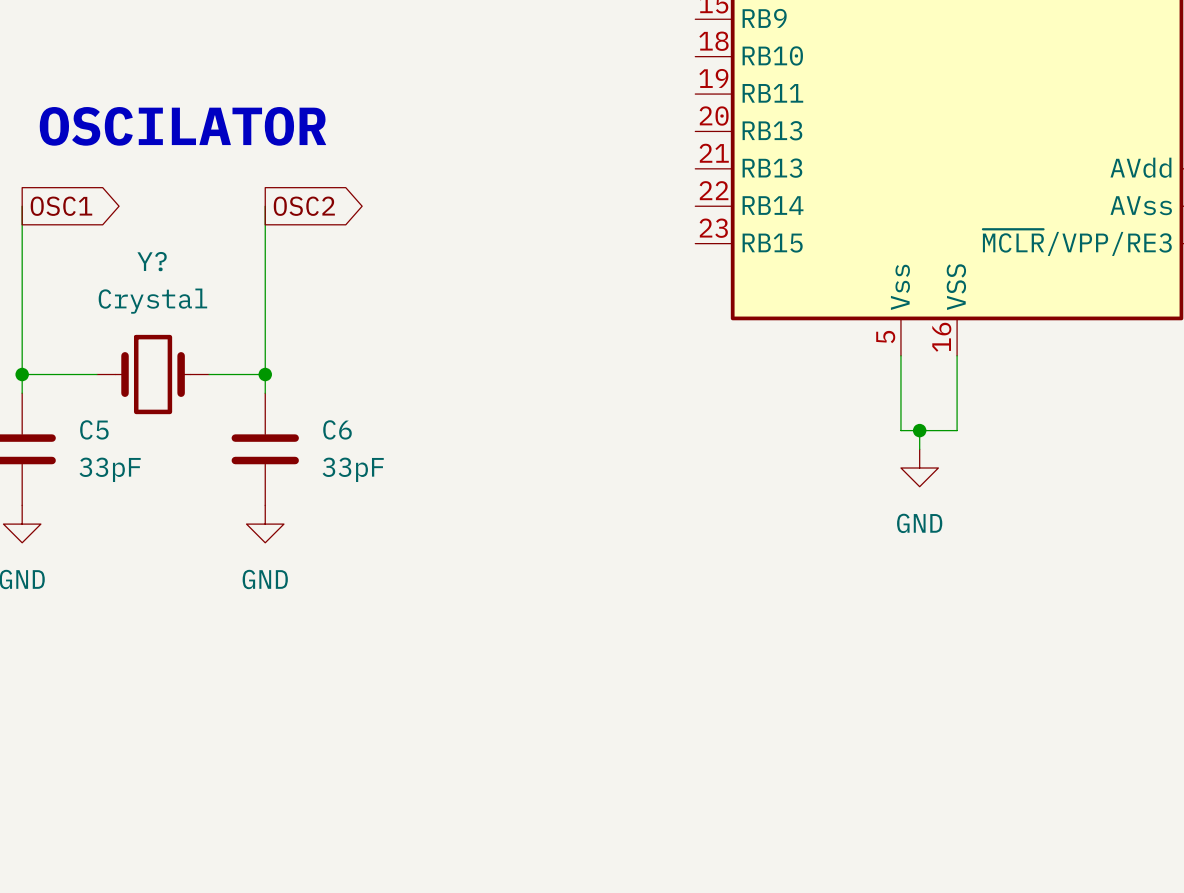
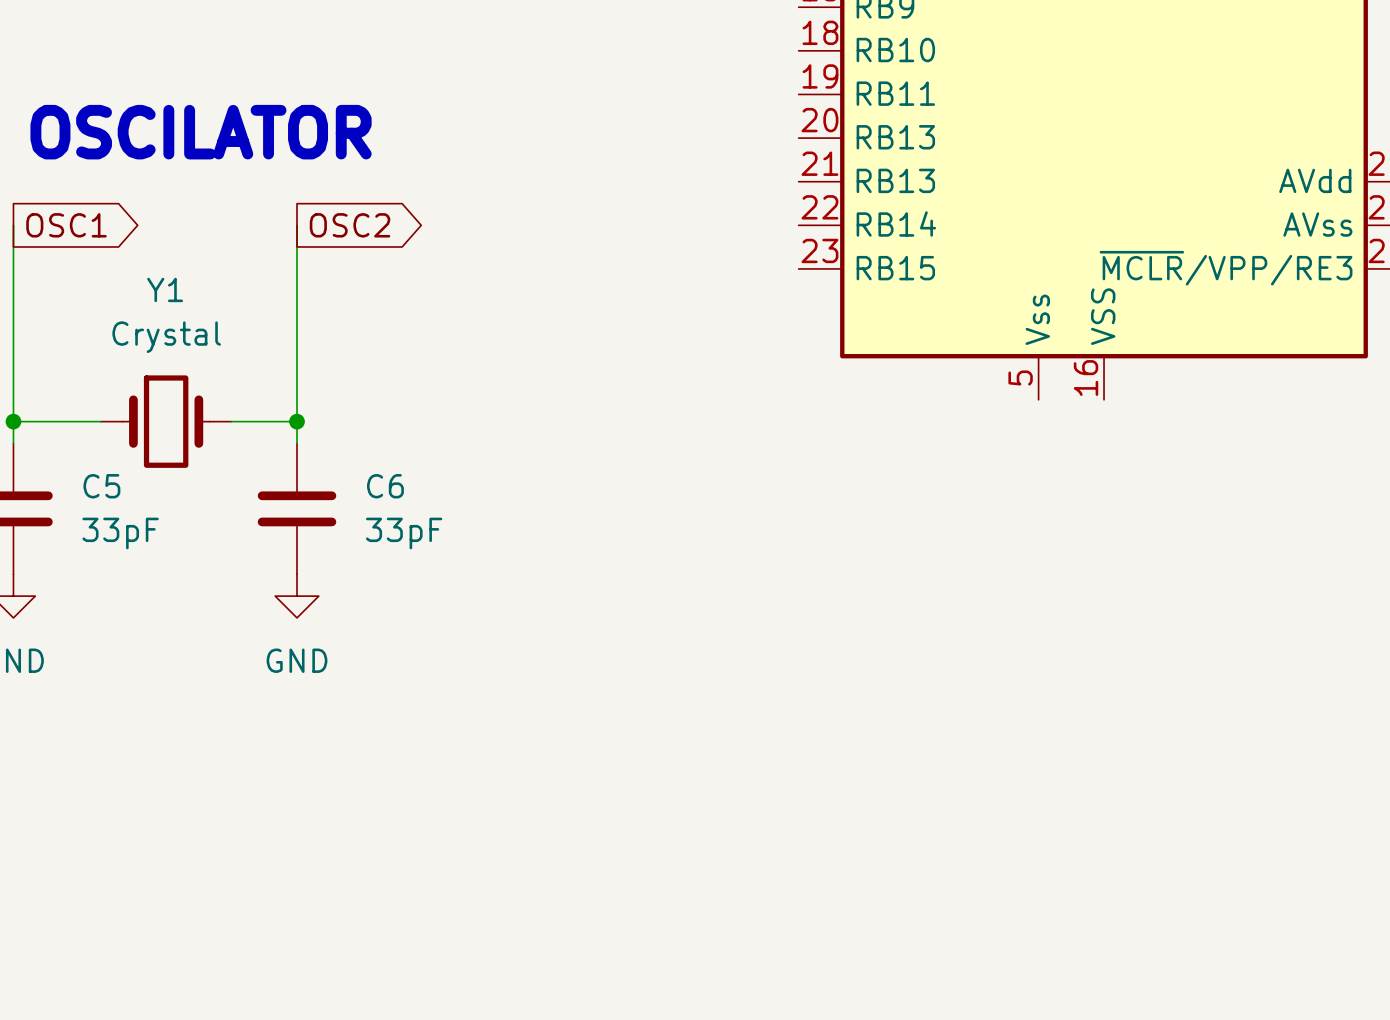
Y? name: Y? (152, 261) -> Y1 (165, 289)
wire: (900, 355) (900, 430) (957, 430) (957, 355) -> none
wire: (919, 430) (919, 449) -> none
junction: (919, 430) -> none
power symbol: GND (919, 468) -> none

